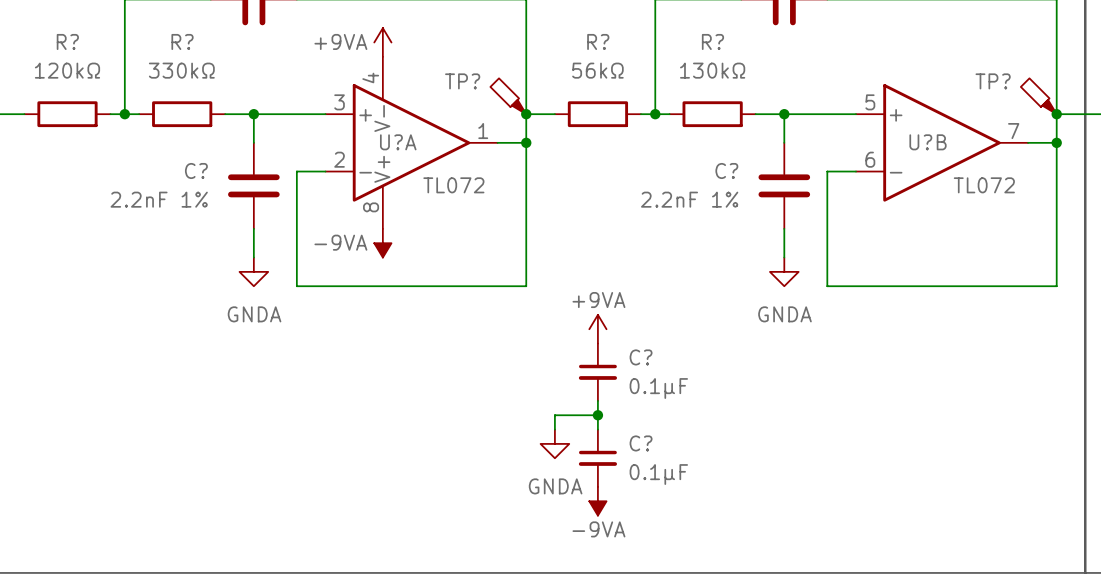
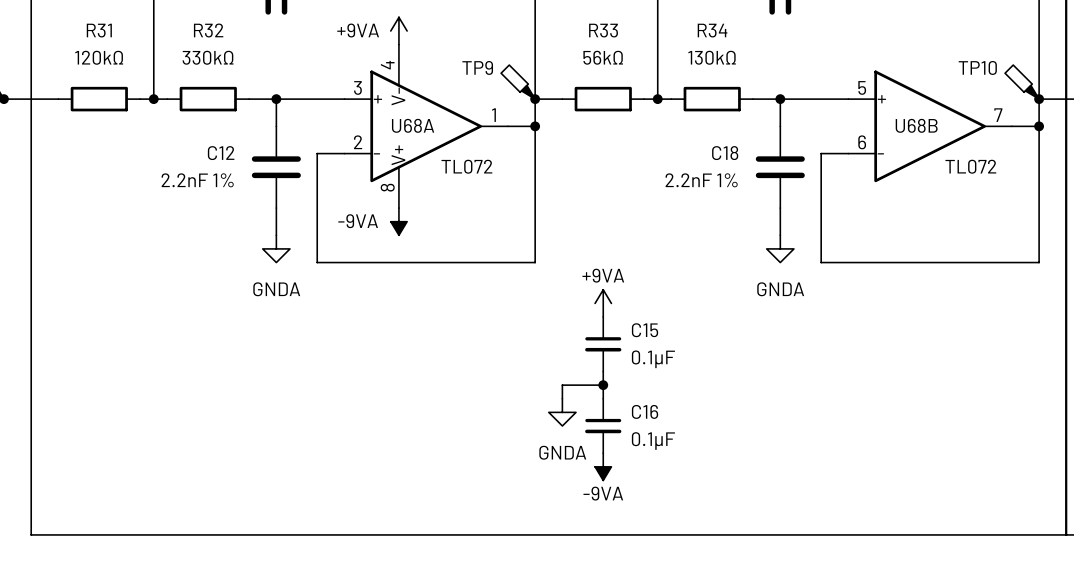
R? name: R? (67, 41) -> R31 (99, 30)
R? name: R? (182, 41) -> R32 (208, 30)
R? name: R? (598, 41) -> R33 (603, 30)
R? name: R? (712, 41) -> R34 (712, 30)
TP? name: TP? (462, 81) -> TP9 (477, 67)
TP? name: TP? (993, 81) -> TP10 (977, 67)
U?A name: U?A (398, 142) -> U68A (413, 125)
U?B name: U?B (928, 142) -> U68B (916, 125)
C? name: C? (196, 170) -> C12 (221, 153)
C? name: C? (726, 170) -> C18 (725, 153)
C? name: C? (641, 357) -> C15 (645, 330)
C? name: C? (641, 443) -> C16 (645, 411)

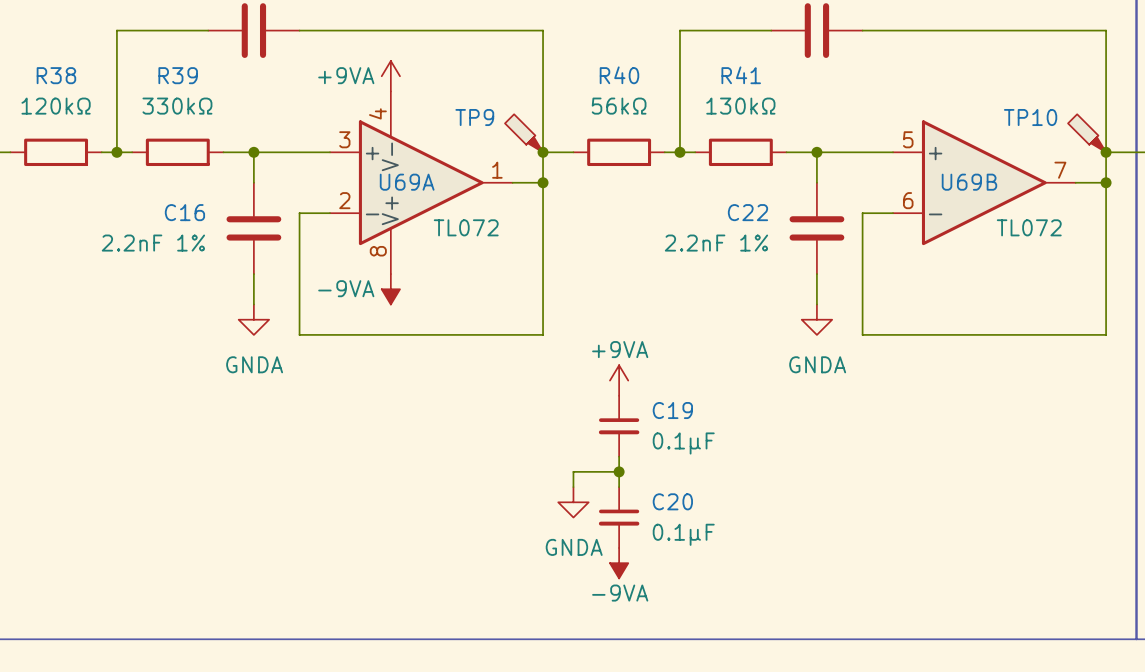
R31 name: R31 (99, 30) -> R38 (56, 75)
R32 name: R32 (208, 30) -> R39 (178, 75)
R33 name: R33 (603, 30) -> R40 (619, 75)
R34 name: R34 (712, 30) -> R41 (741, 75)
U68A name: U68A (413, 125) -> U69A (407, 182)
U68B name: U68B (916, 125) -> U69B (969, 182)
C12 name: C12 (221, 153) -> C16 (184, 212)
C18 name: C18 (725, 153) -> C22 (747, 212)
C15 name: C15 (645, 330) -> C19 (672, 410)
C16 name: C16 (645, 411) -> C20 (672, 501)

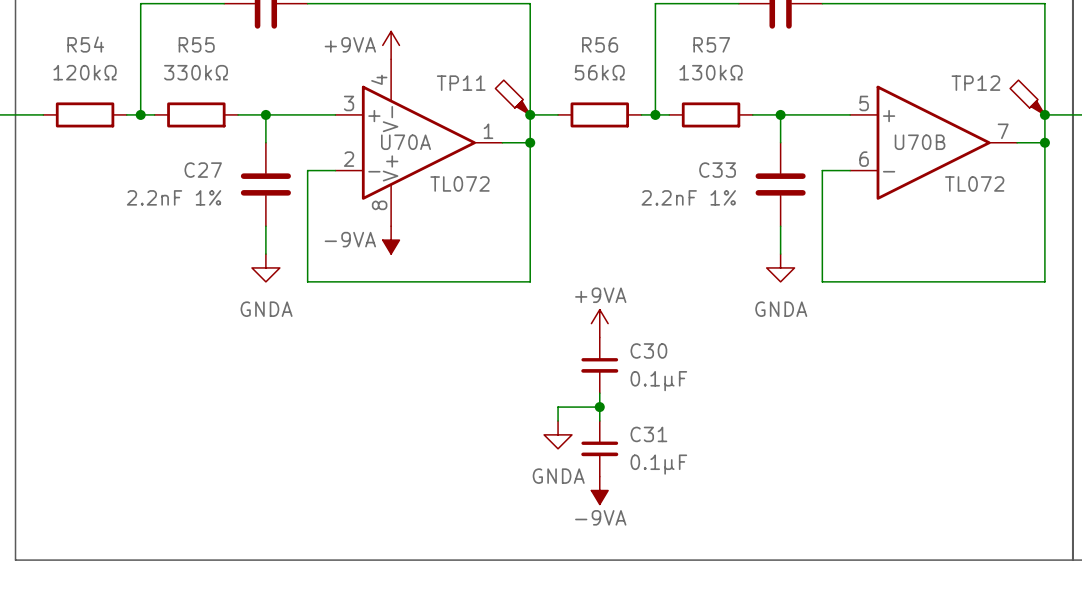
R38 name: R38 (56, 75) -> R54 (85, 44)
R39 name: R39 (178, 75) -> R55 (196, 44)
R40 name: R40 (619, 75) -> R56 (600, 44)
R41 name: R41 (741, 75) -> R57 (711, 44)
TP9 name: TP9 (474, 117) -> TP11 (461, 83)
TP10 name: TP10 (1030, 117) -> TP12 (975, 83)
U69A name: U69A (407, 182) -> U70A (406, 142)
U69B name: U69B (969, 182) -> U70B (920, 142)
C16 name: C16 (184, 212) -> C27 (203, 170)
C22 name: C22 (747, 212) -> C33 (717, 170)
C19 name: C19 (672, 410) -> C30 (648, 350)
C20 name: C20 (672, 501) -> C31 (648, 434)

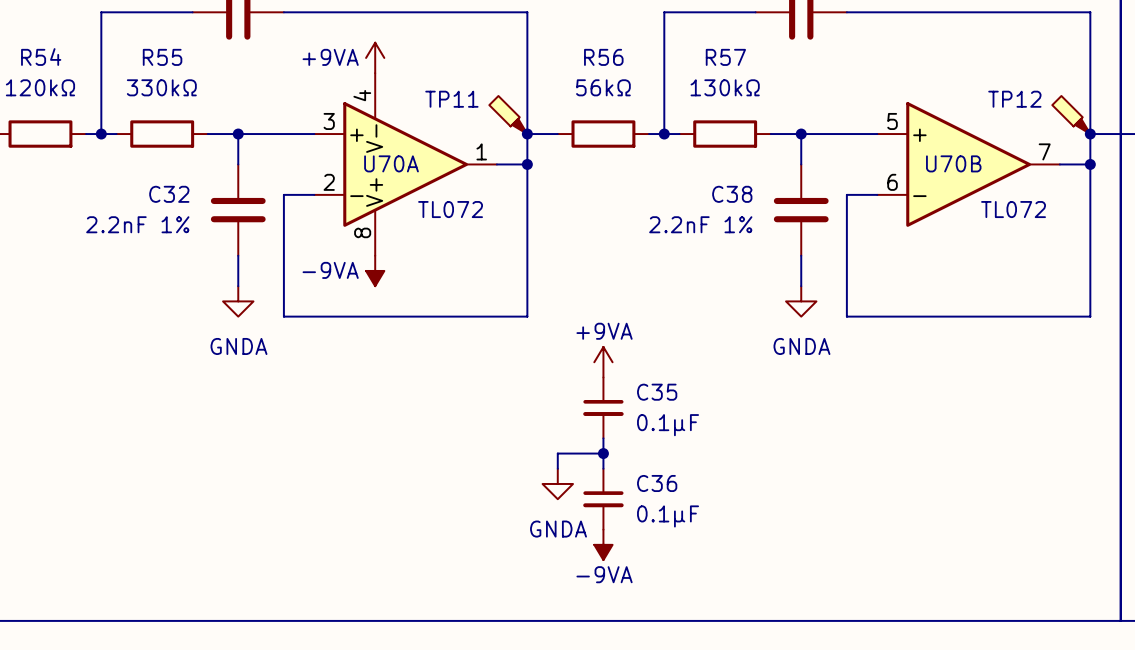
C27 name: C27 (203, 170) -> C32 (169, 194)
C33 name: C33 (717, 170) -> C38 (732, 194)
C30 name: C30 (648, 350) -> C35 (657, 392)
C31 name: C31 (648, 434) -> C36 (657, 483)

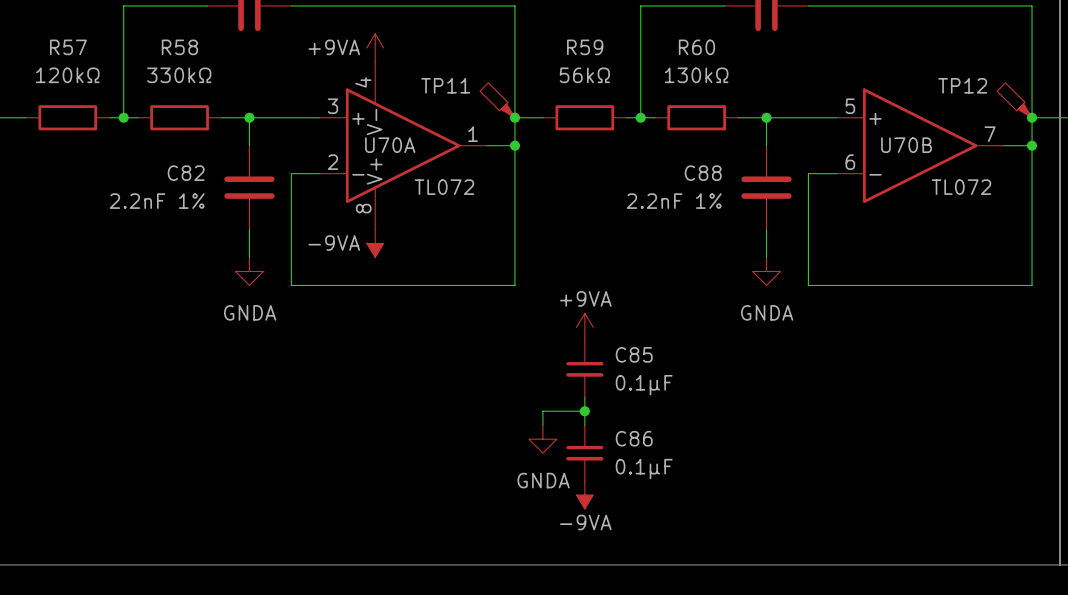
R54 name: R54 (41, 57) -> R57 (68, 47)
R55 name: R55 (162, 57) -> R58 (179, 47)
R56 name: R56 (603, 57) -> R59 (585, 47)
R57 name: R57 (725, 57) -> R60 (696, 47)
C32 name: C32 (169, 194) -> C82 (186, 173)
C38 name: C38 (732, 194) -> C88 (703, 173)
C35 name: C35 (657, 392) -> C85 (634, 354)
C36 name: C36 (657, 483) -> C86 (634, 438)

